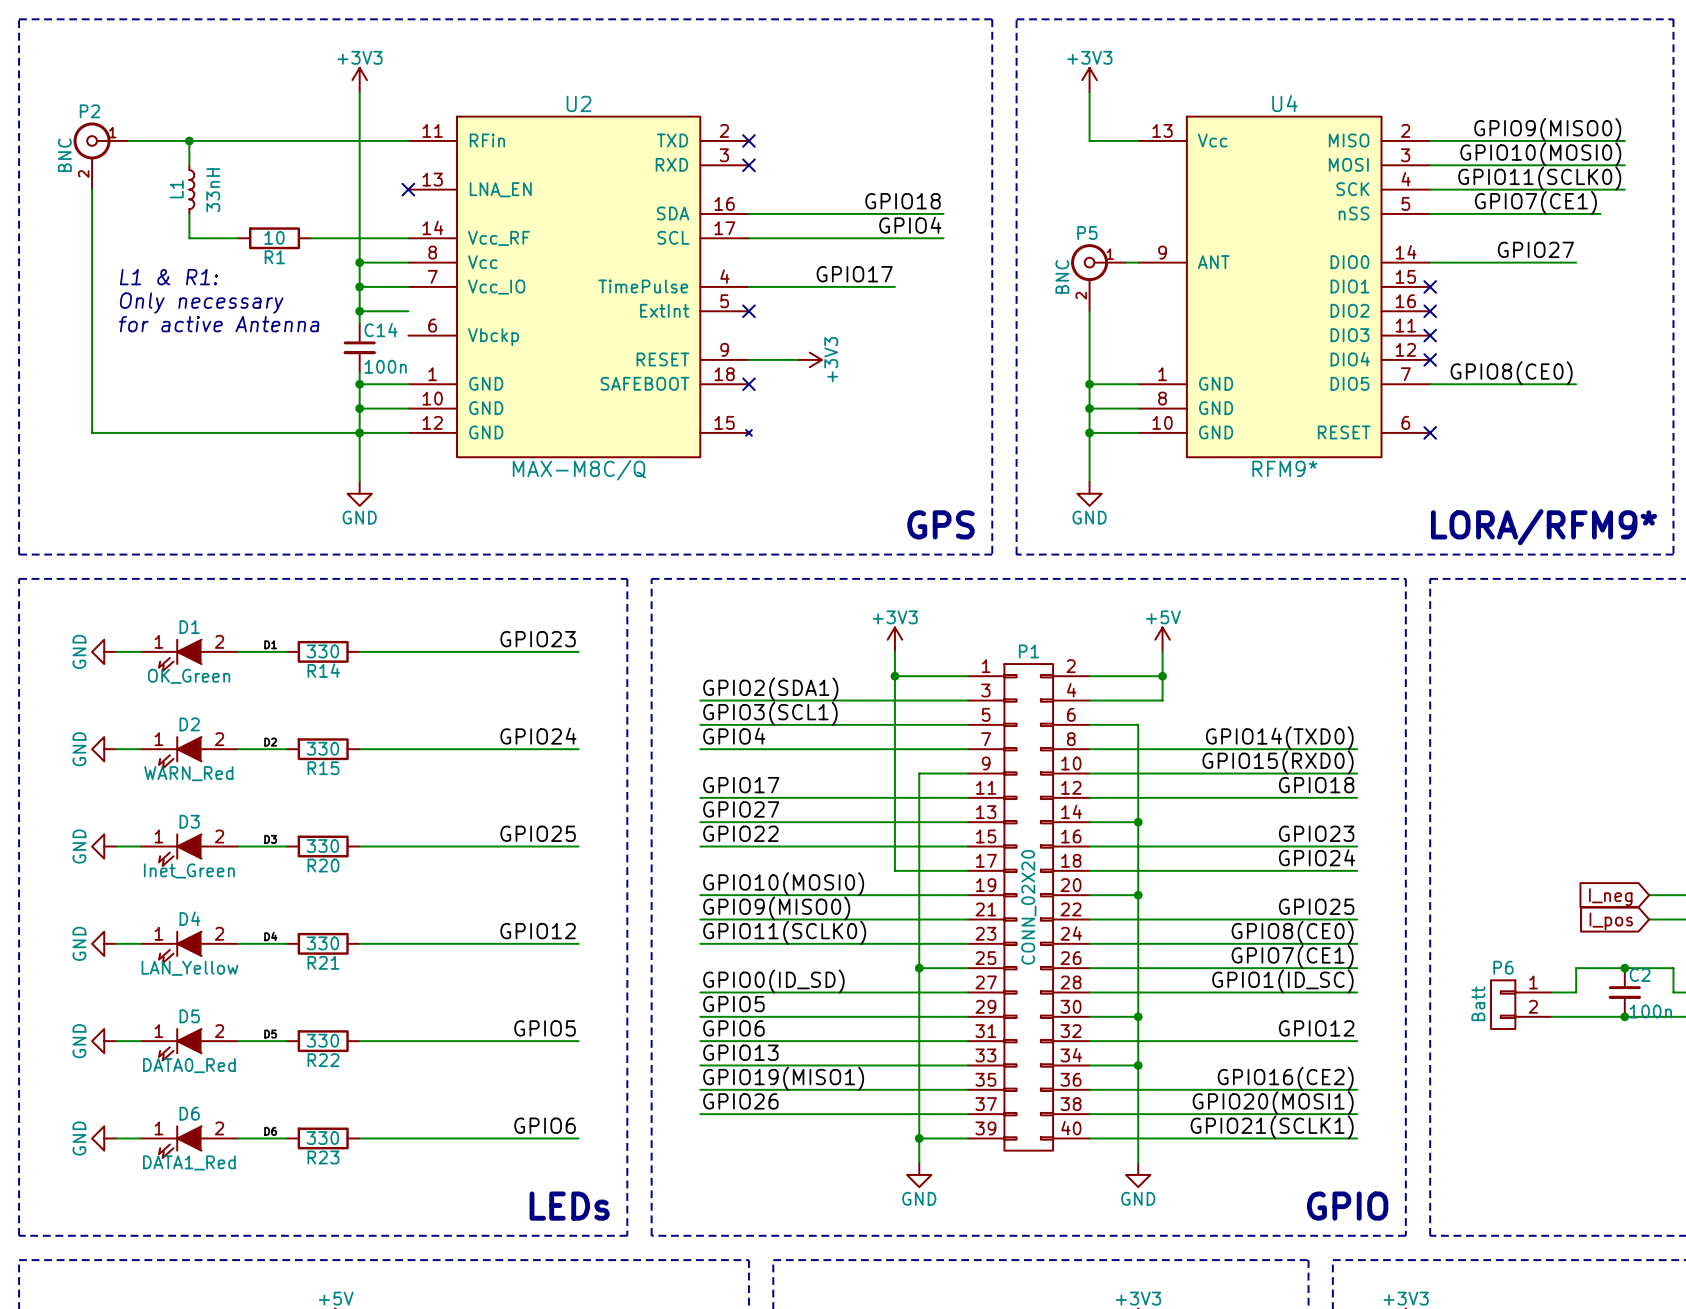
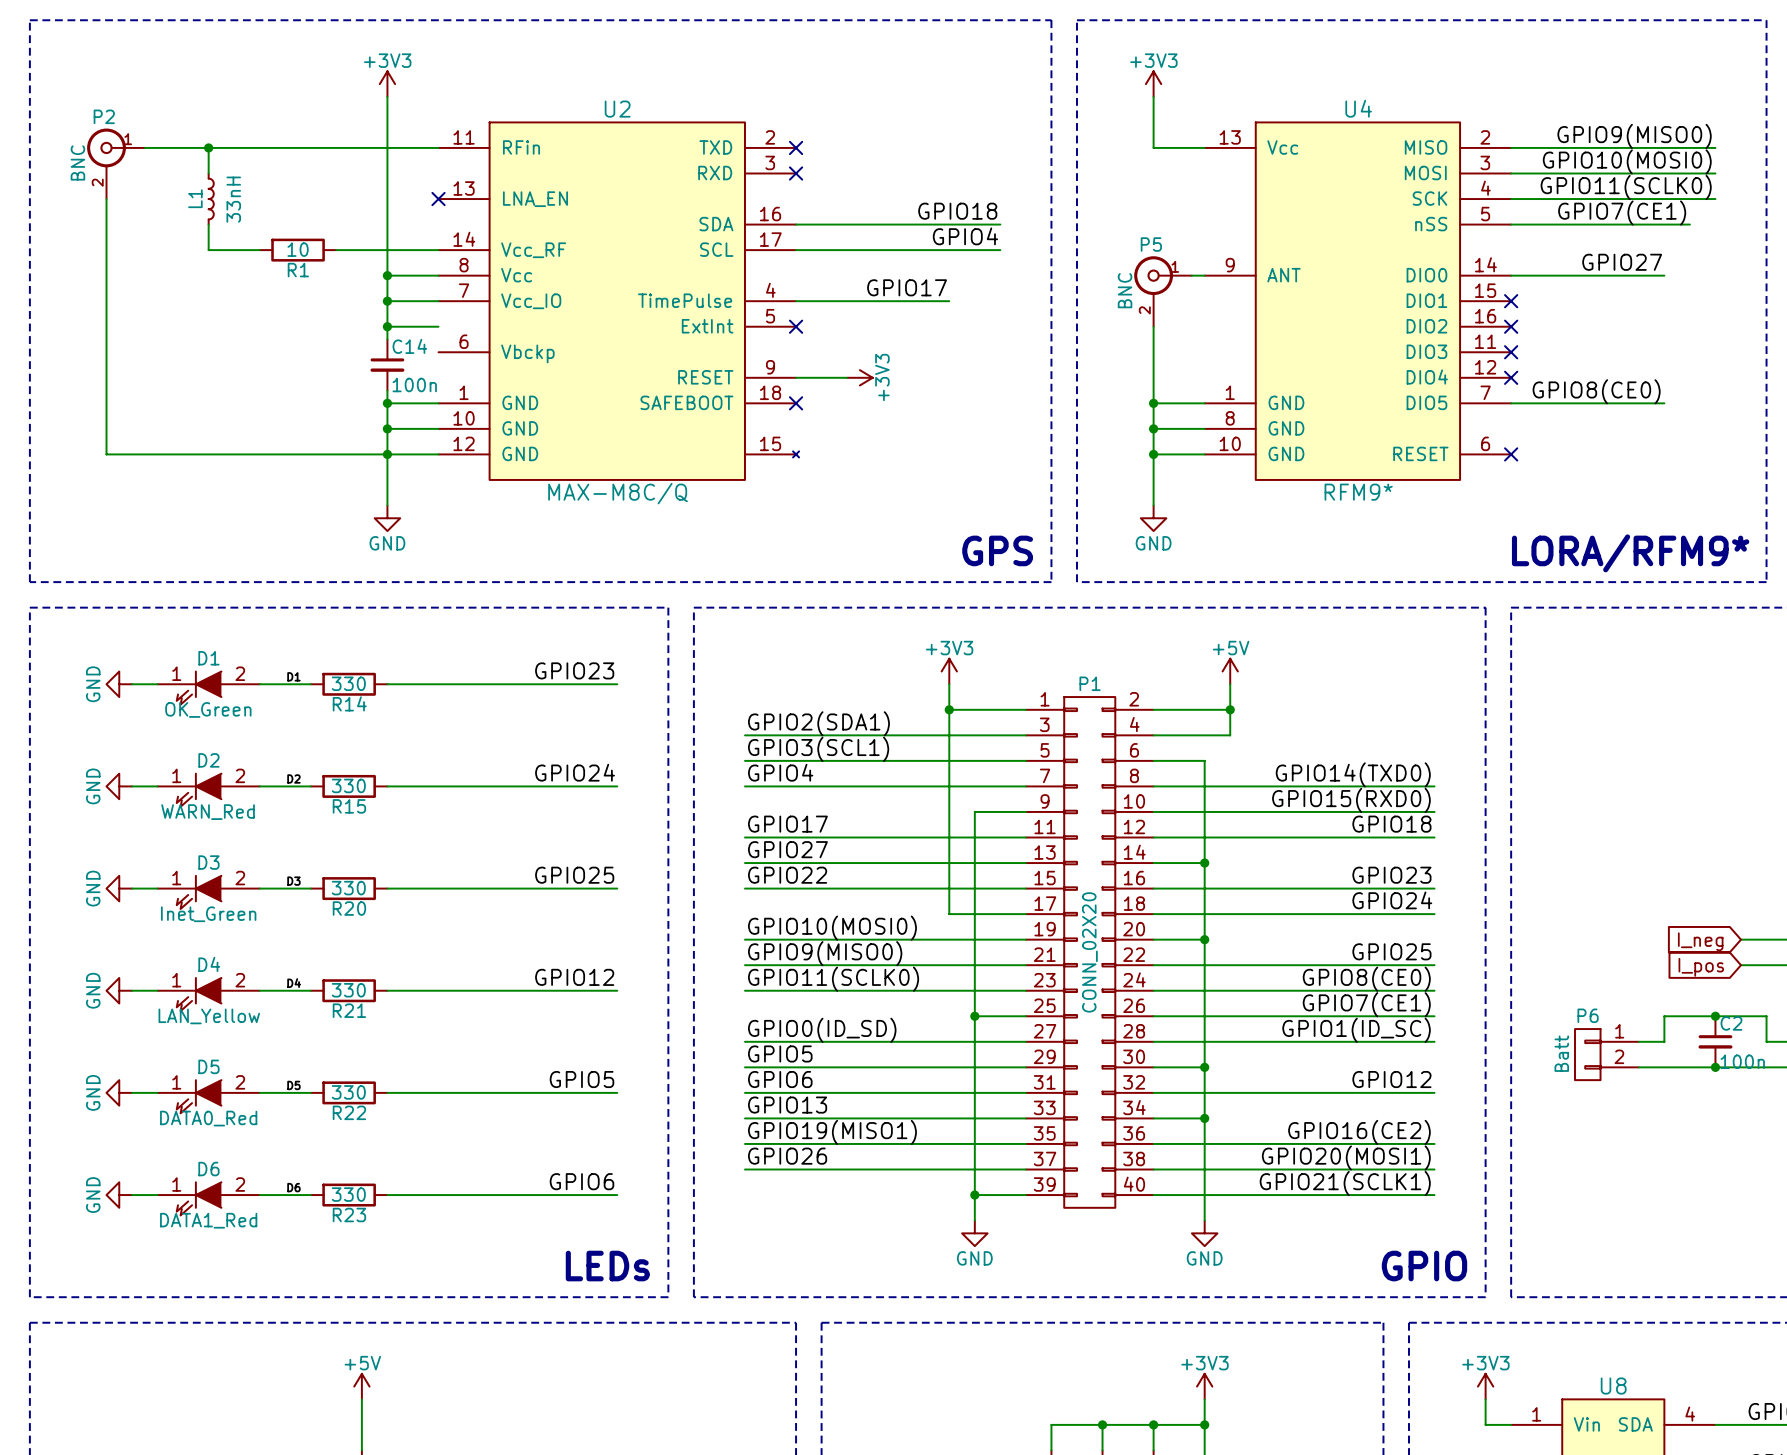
text: L1 & R1: (168, 277) -> none
text: Only necessary (201, 303) -> none
text: for active Antenna (219, 324) -> none

